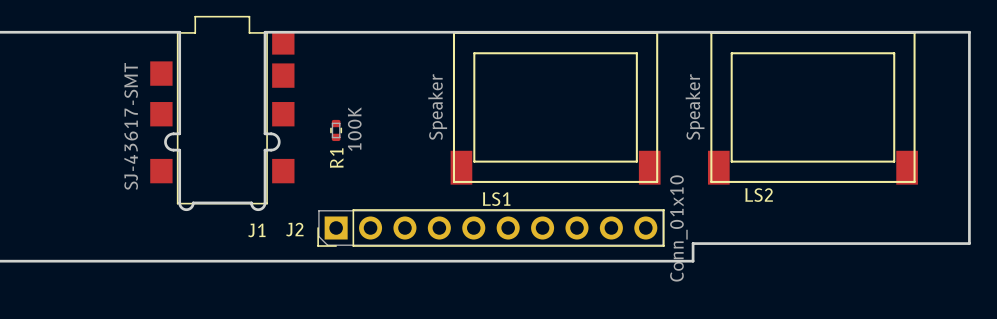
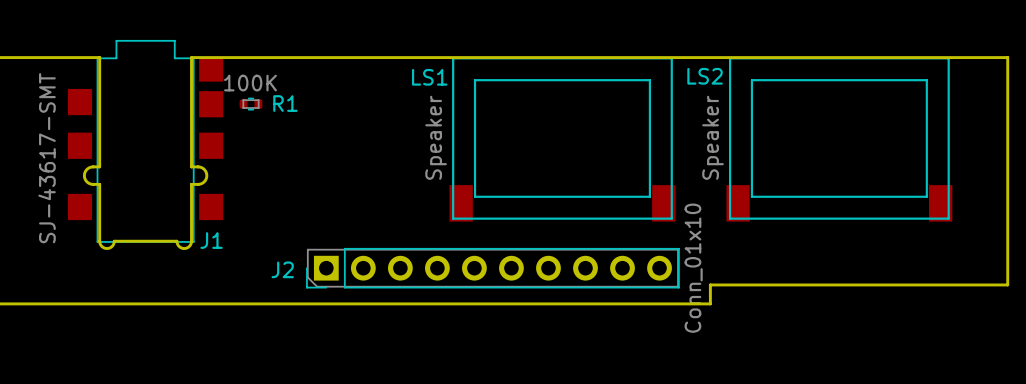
board edge: (125, 32) (179, 32) (179, 133) (169, 134) (165, 143) (169, 149) (179, 150) (180, 205) (187, 209) (191, 207) (193, 202) -> (99, 57) (99, 166) (88, 168) (84, 175) (88, 183) (99, 184) (100, 244) (106, 248) (112, 246) (114, 241) (172, 241)
board edge: (265, 32) (265, 133) (275, 134) (279, 141) (275, 149) (265, 150) (264, 205) (258, 209) (253, 207) (251, 202) (197, 202) -> (249, 57) (191, 57) (191, 166) (202, 168) (206, 176) (202, 183) (191, 184) (190, 244) (187, 247) (182, 248) (178, 245) (176, 241)
J1 position: (222, 110) -> (145, 141)
R1 rotation: 0° (336, 130) -> 90° clockwise (250, 104)
R1 position: (336, 130) -> (250, 104)
R1 name position: R1 (336, 158) -> R1 (285, 103)
LS2 name position: LS2 (759, 195) -> LS2 (705, 76)
LS1 name position: LS1 (496, 199) -> LS1 (429, 77)
J1 name position: J1 (256, 230) -> J1 (211, 240)

